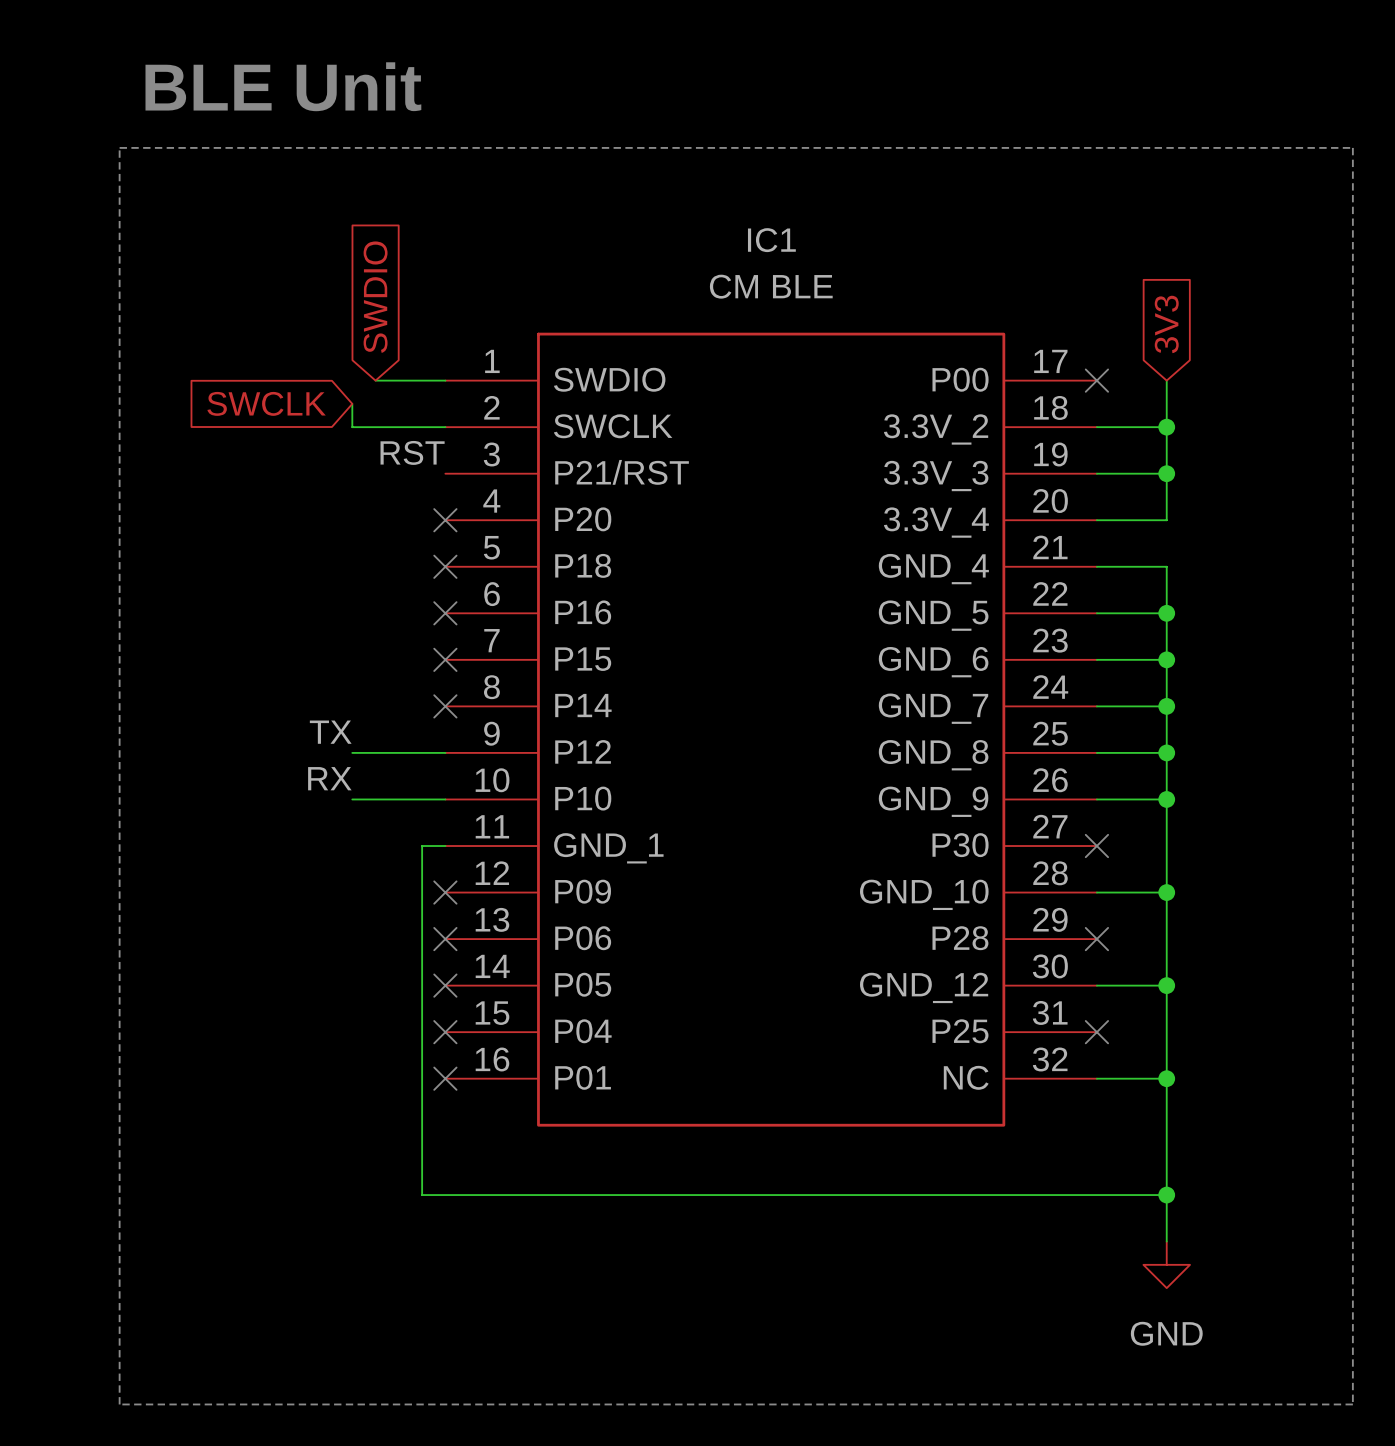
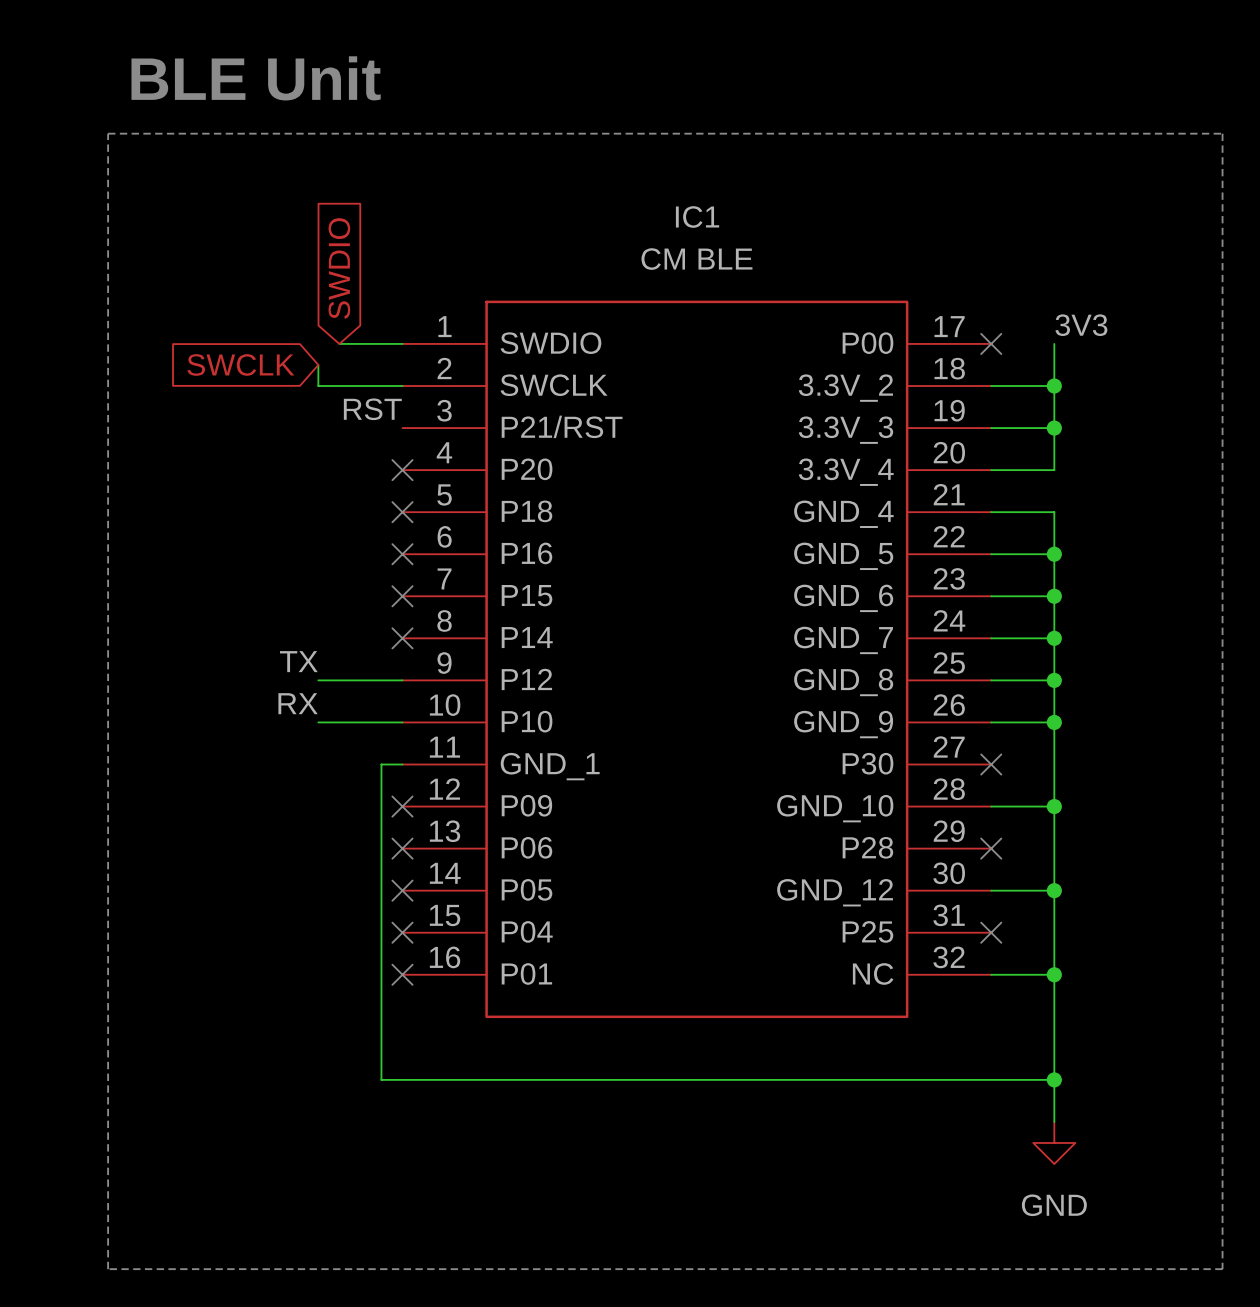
global label: 3V3 (1166, 324) -> none
label: none -> 3V3 (1081, 325)

